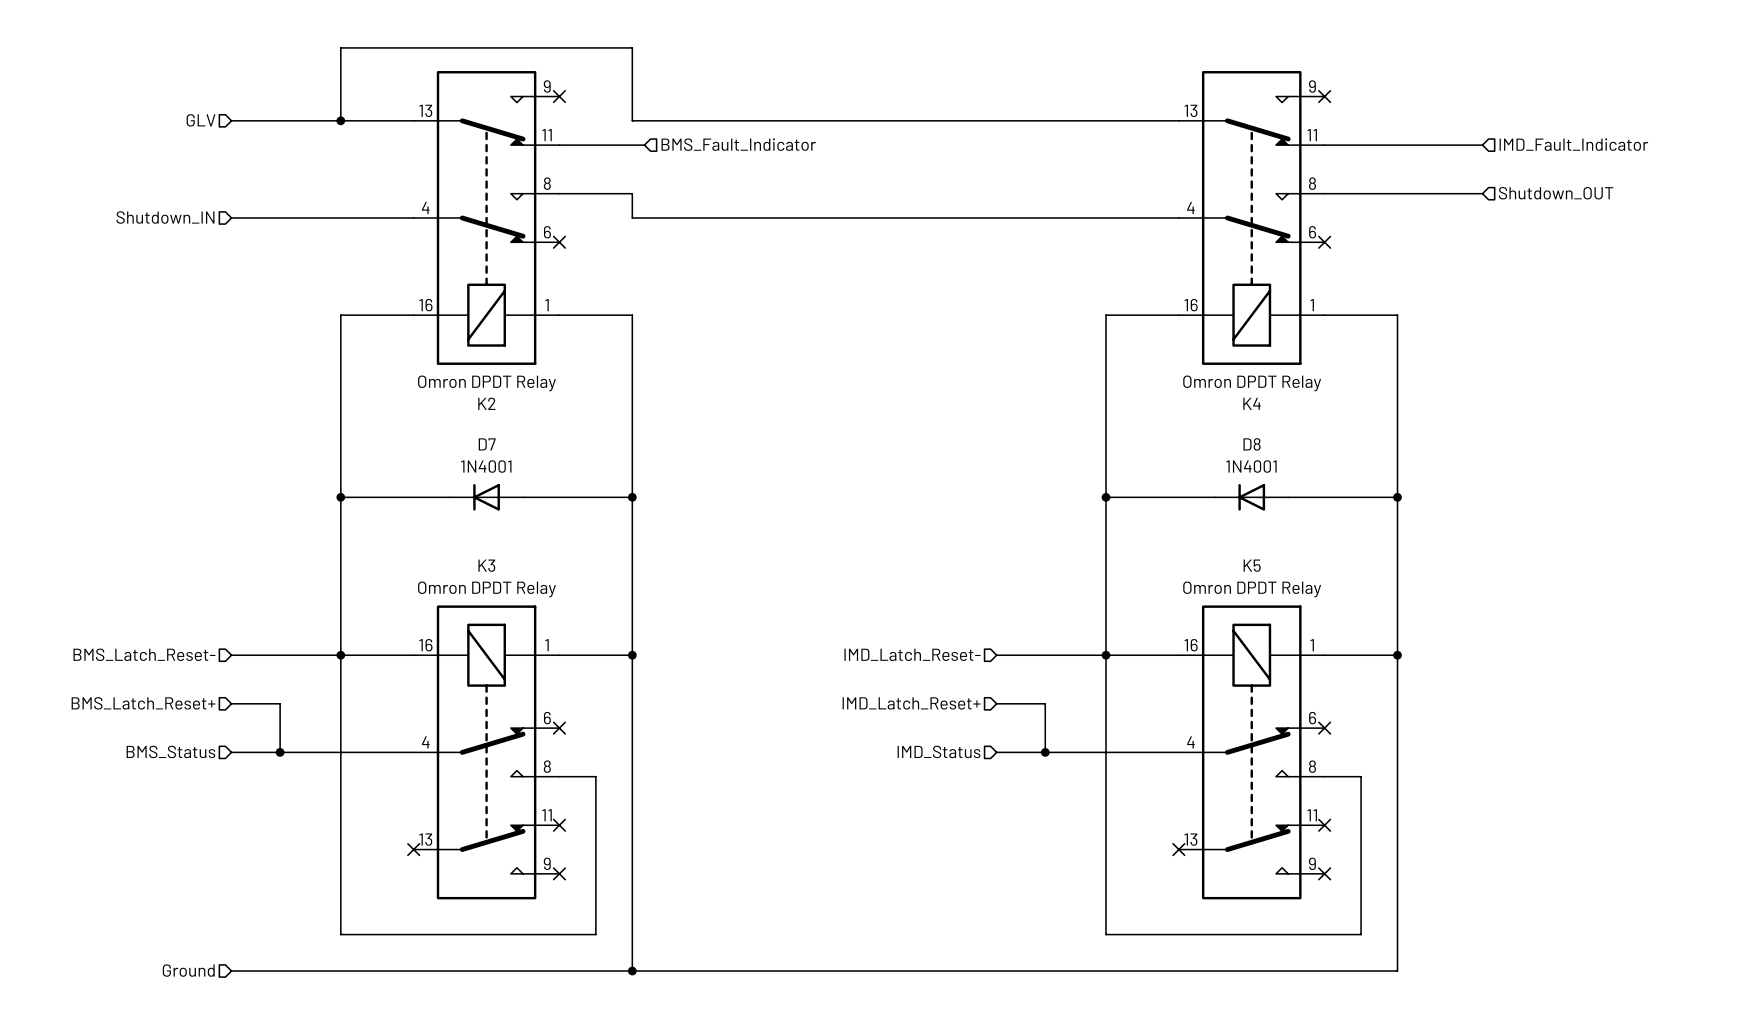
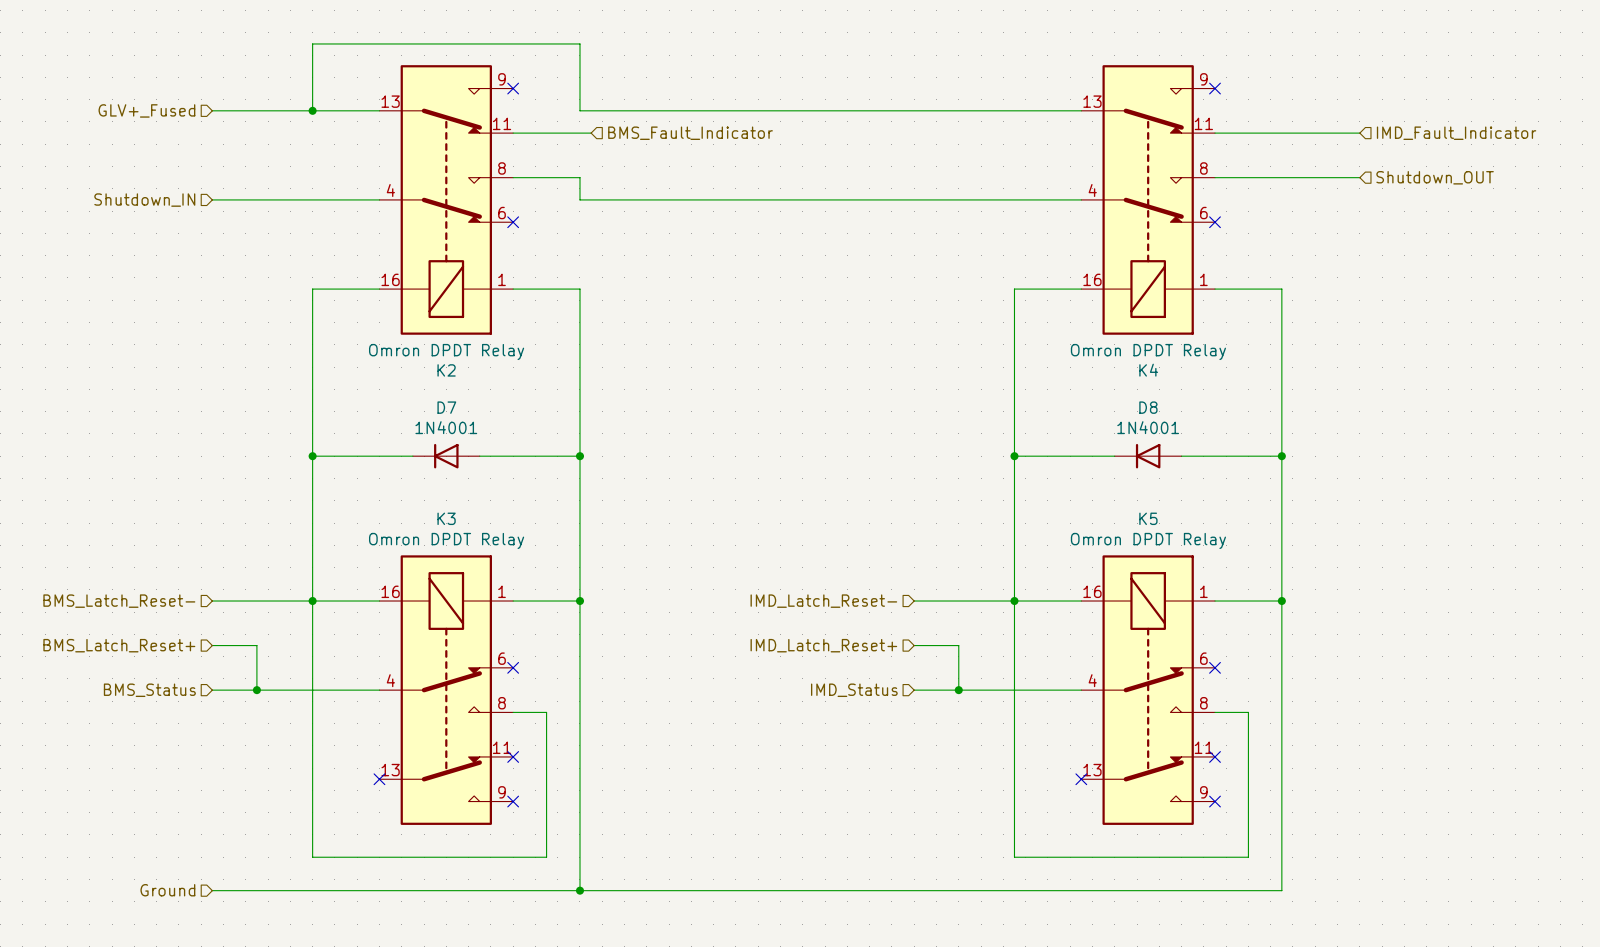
hierarchical label: GLV (201, 120) -> GLV+_Fused (146, 110)

